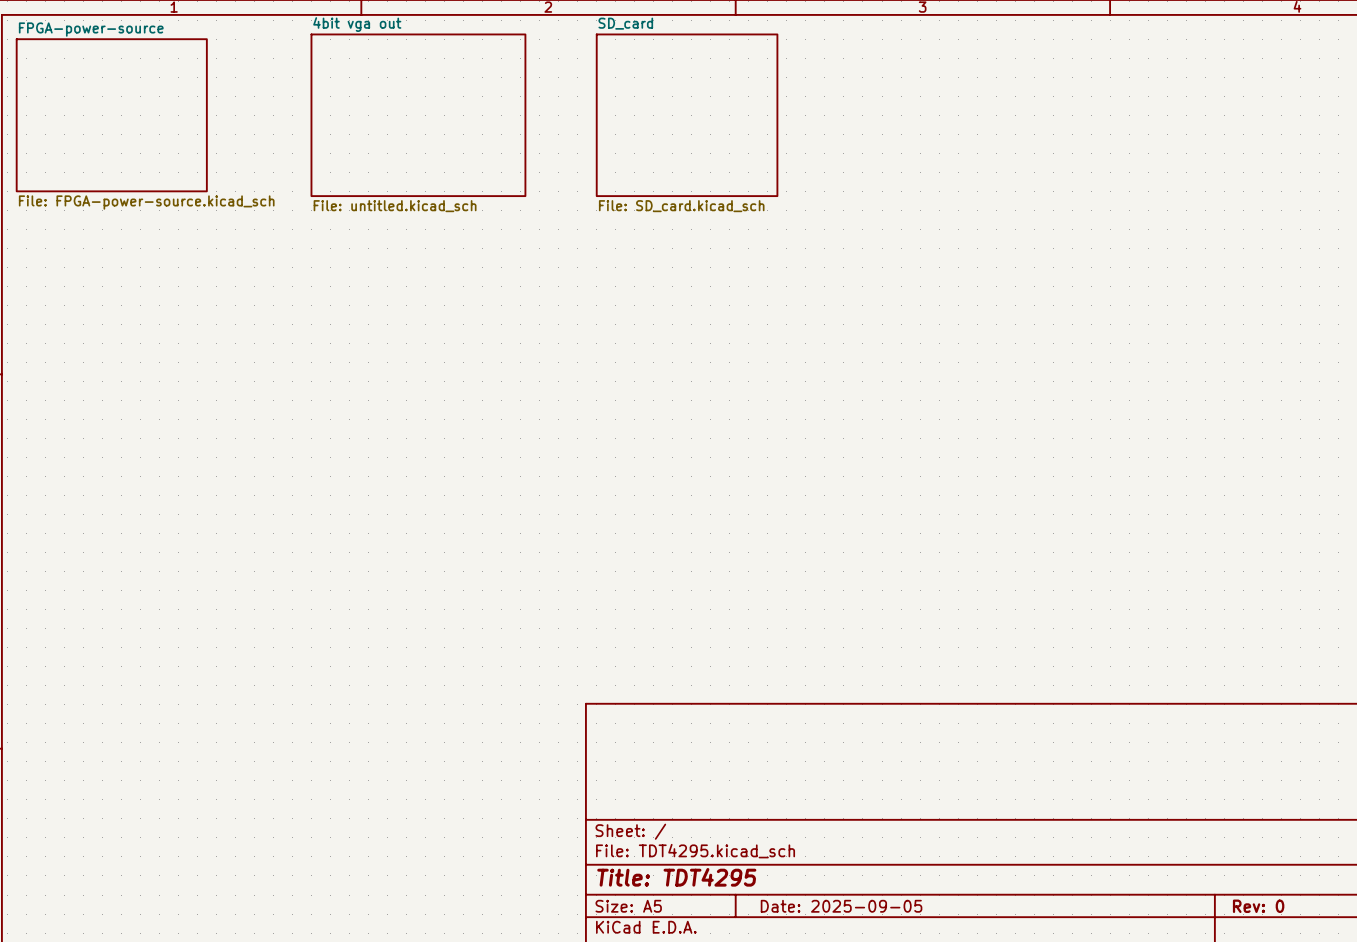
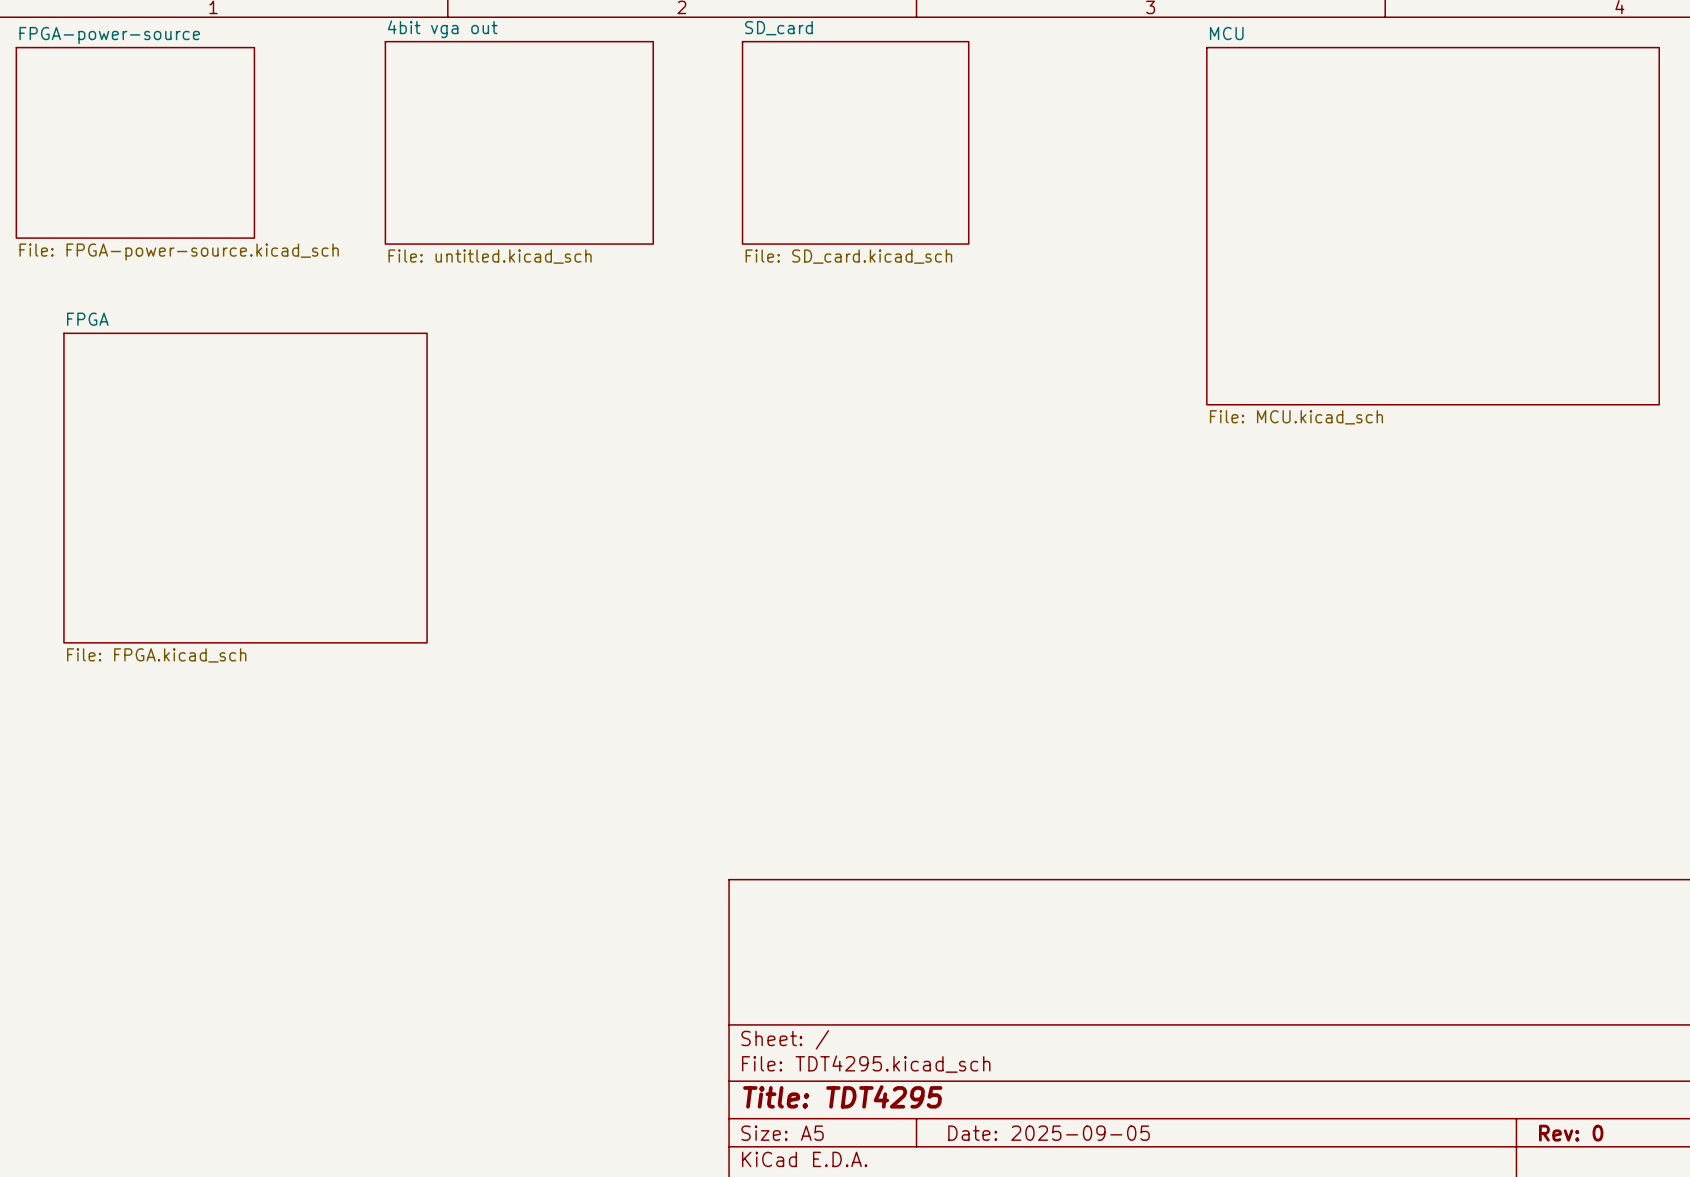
sheet MCU: none -> File: MCU.kicad_sch (1433, 226)
sheet FPGA: none -> File: FPGA.kicad_sch (245, 488)

